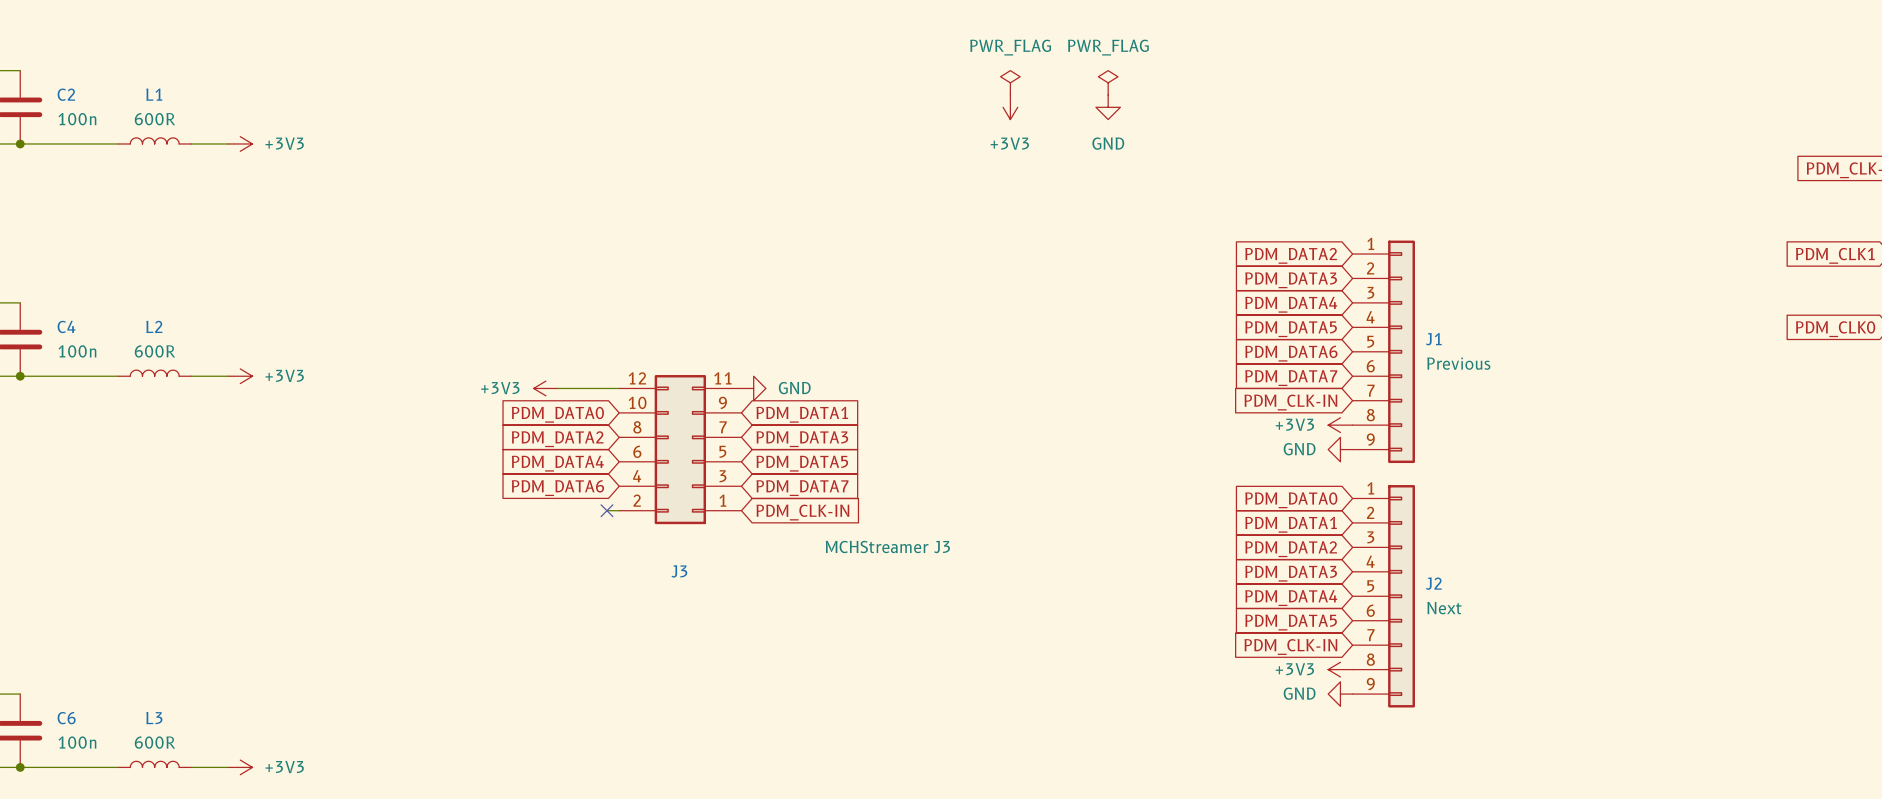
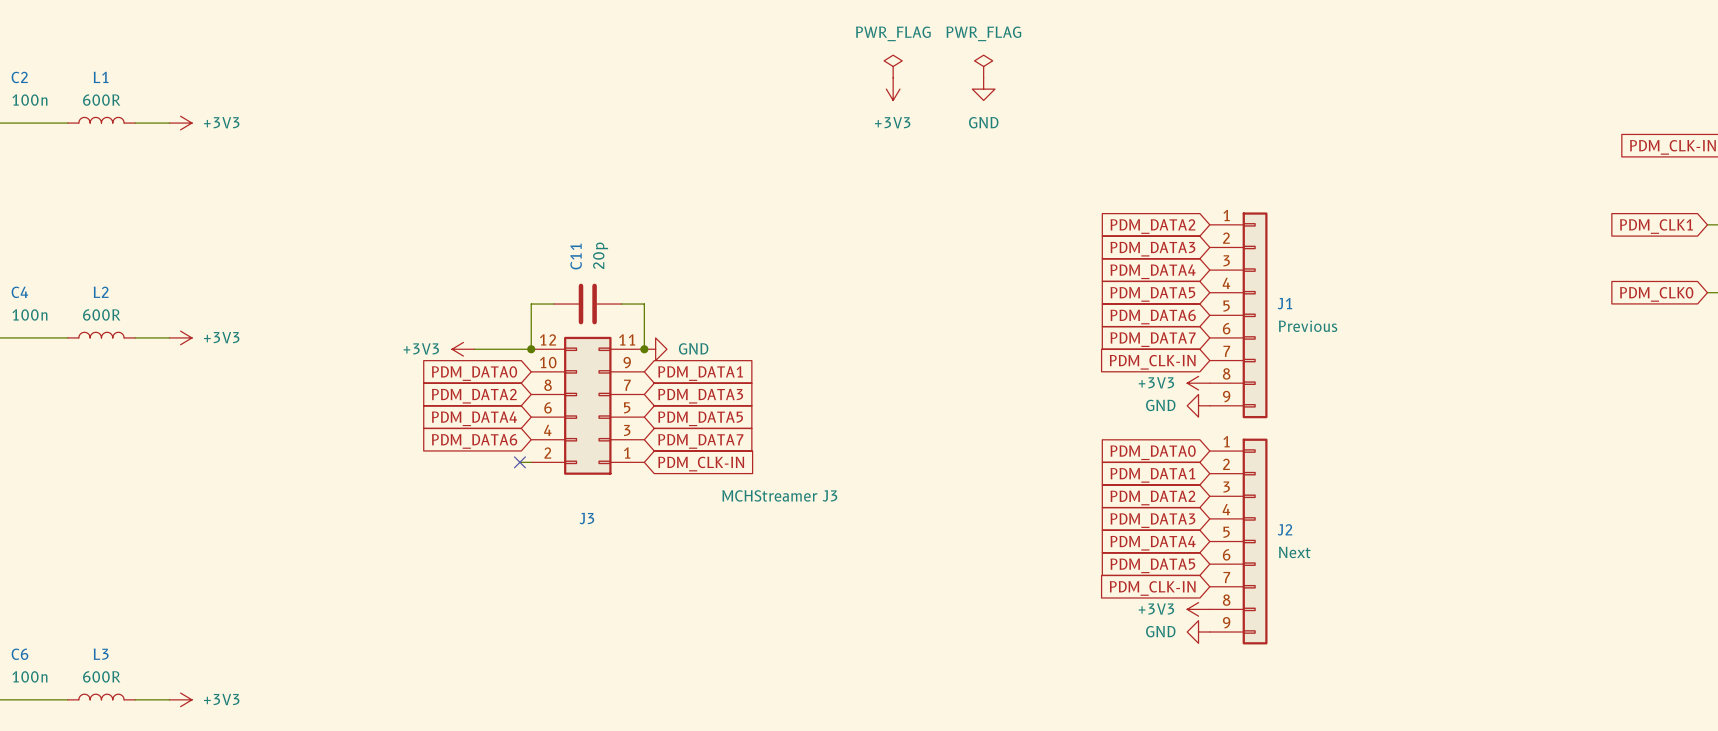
wire: none -> (553, 304) (531, 304) (531, 349)
C11: none -> 20p (587, 304)
wire: none -> (621, 304) (644, 304) (644, 349)
junction: none -> (531, 349)
junction: none -> (644, 349)

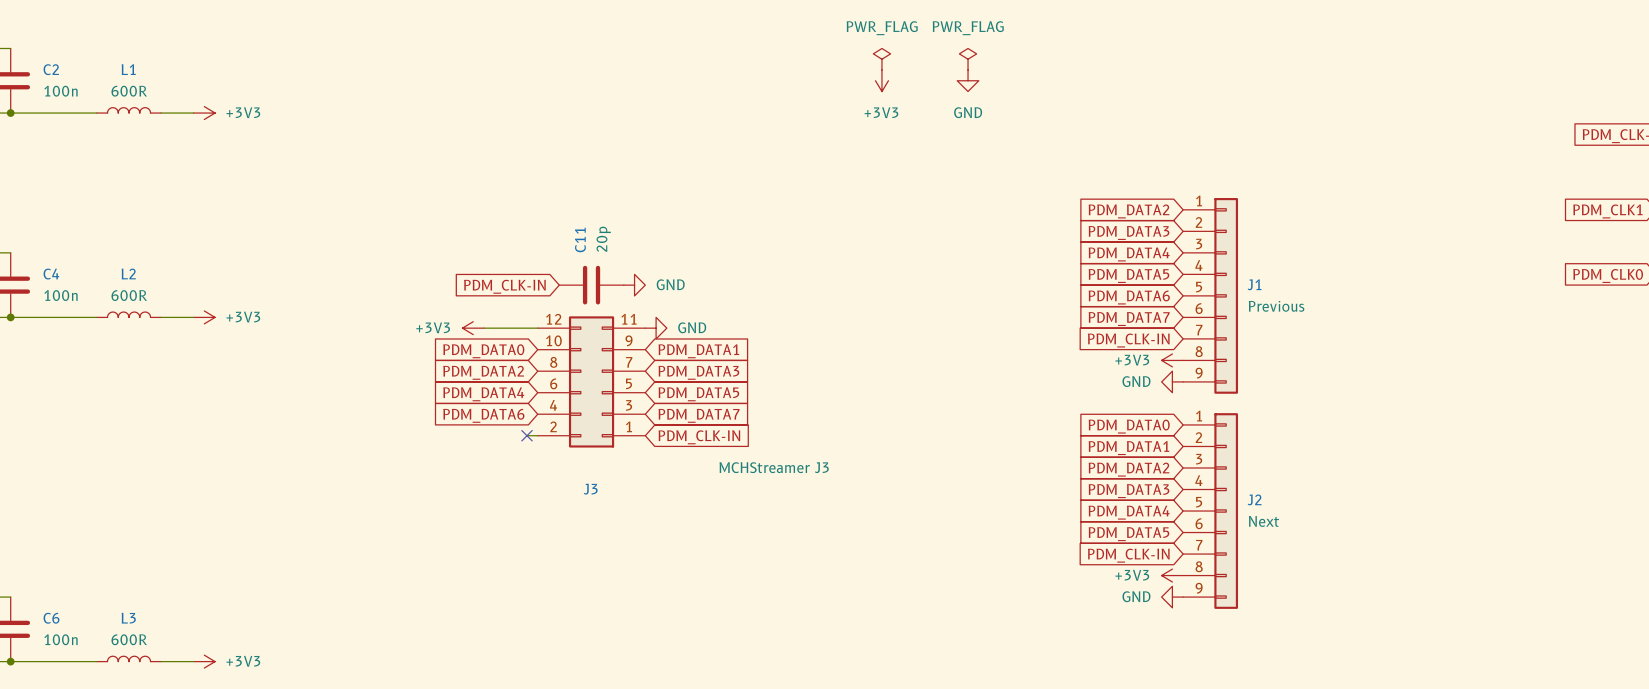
wire: (553, 304) (531, 304) (531, 349) -> none
wire: (621, 304) (644, 304) (644, 349) -> none
power symbol: none -> GND (634, 285)
global label: none -> PDM_CLK-IN (504, 286)
junction: (531, 349) -> none
junction: (644, 349) -> none

